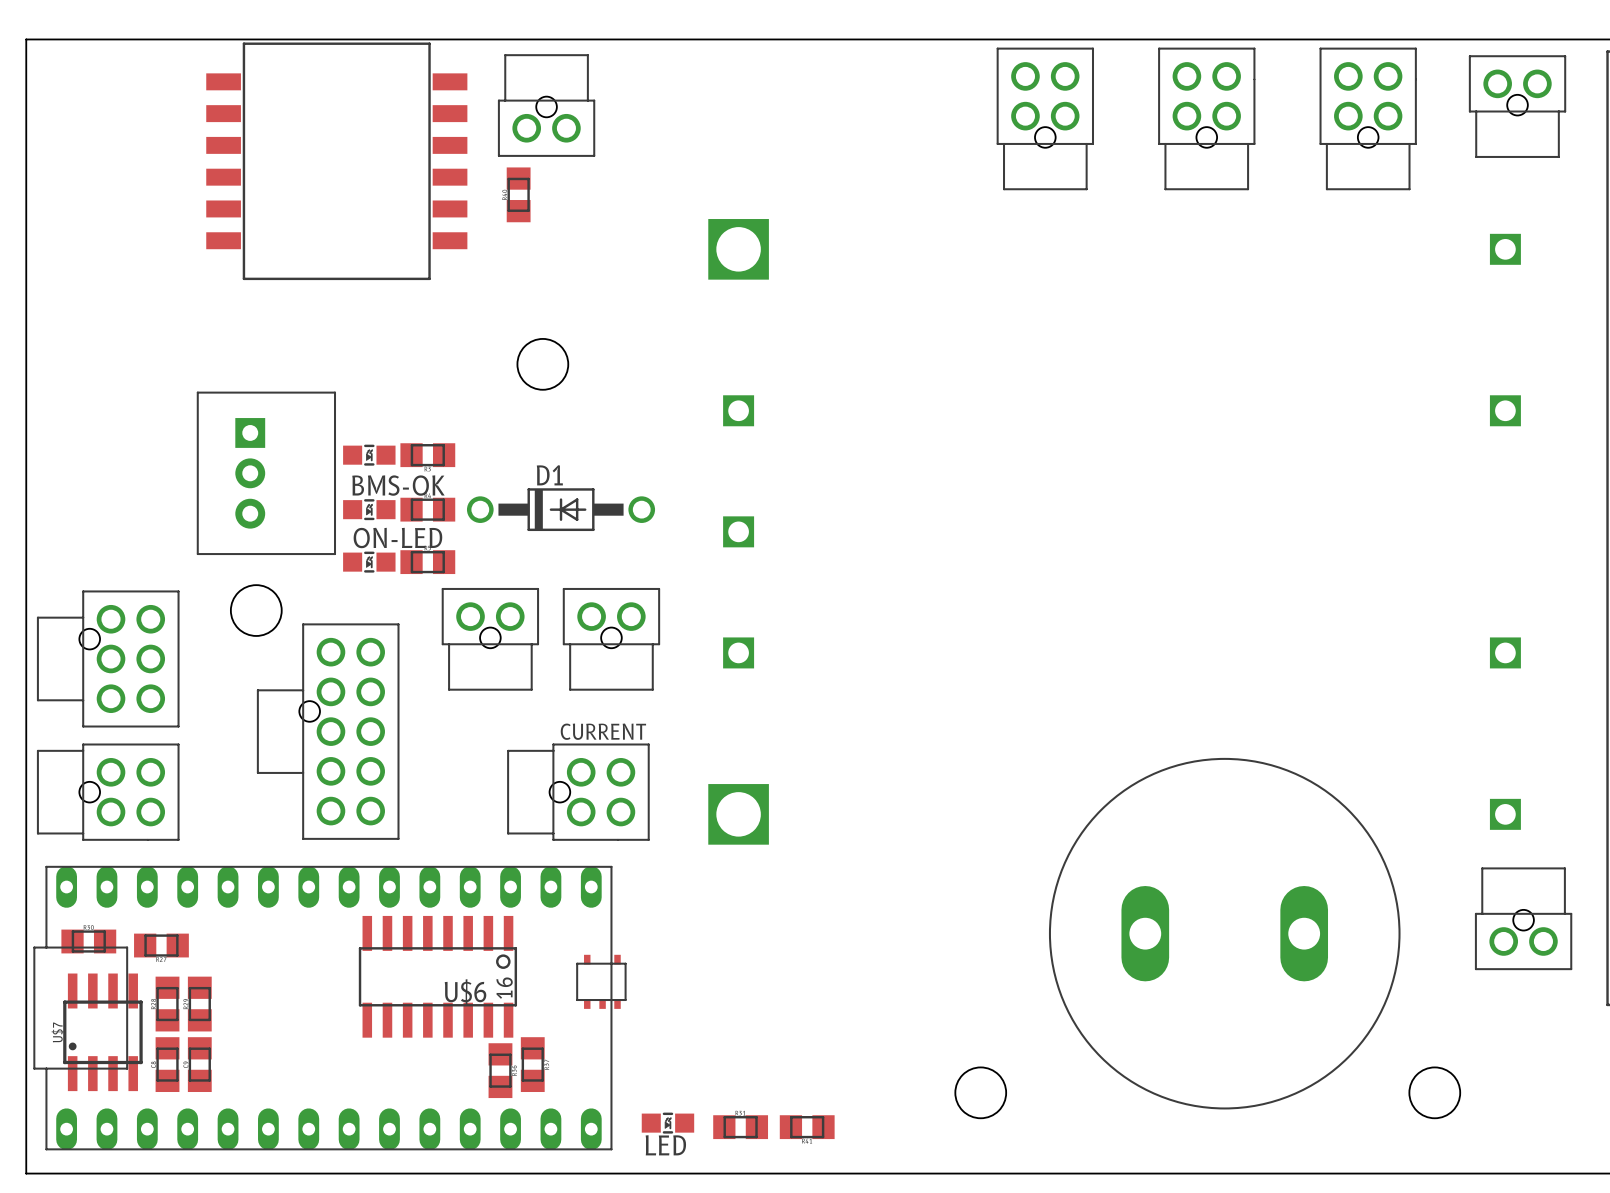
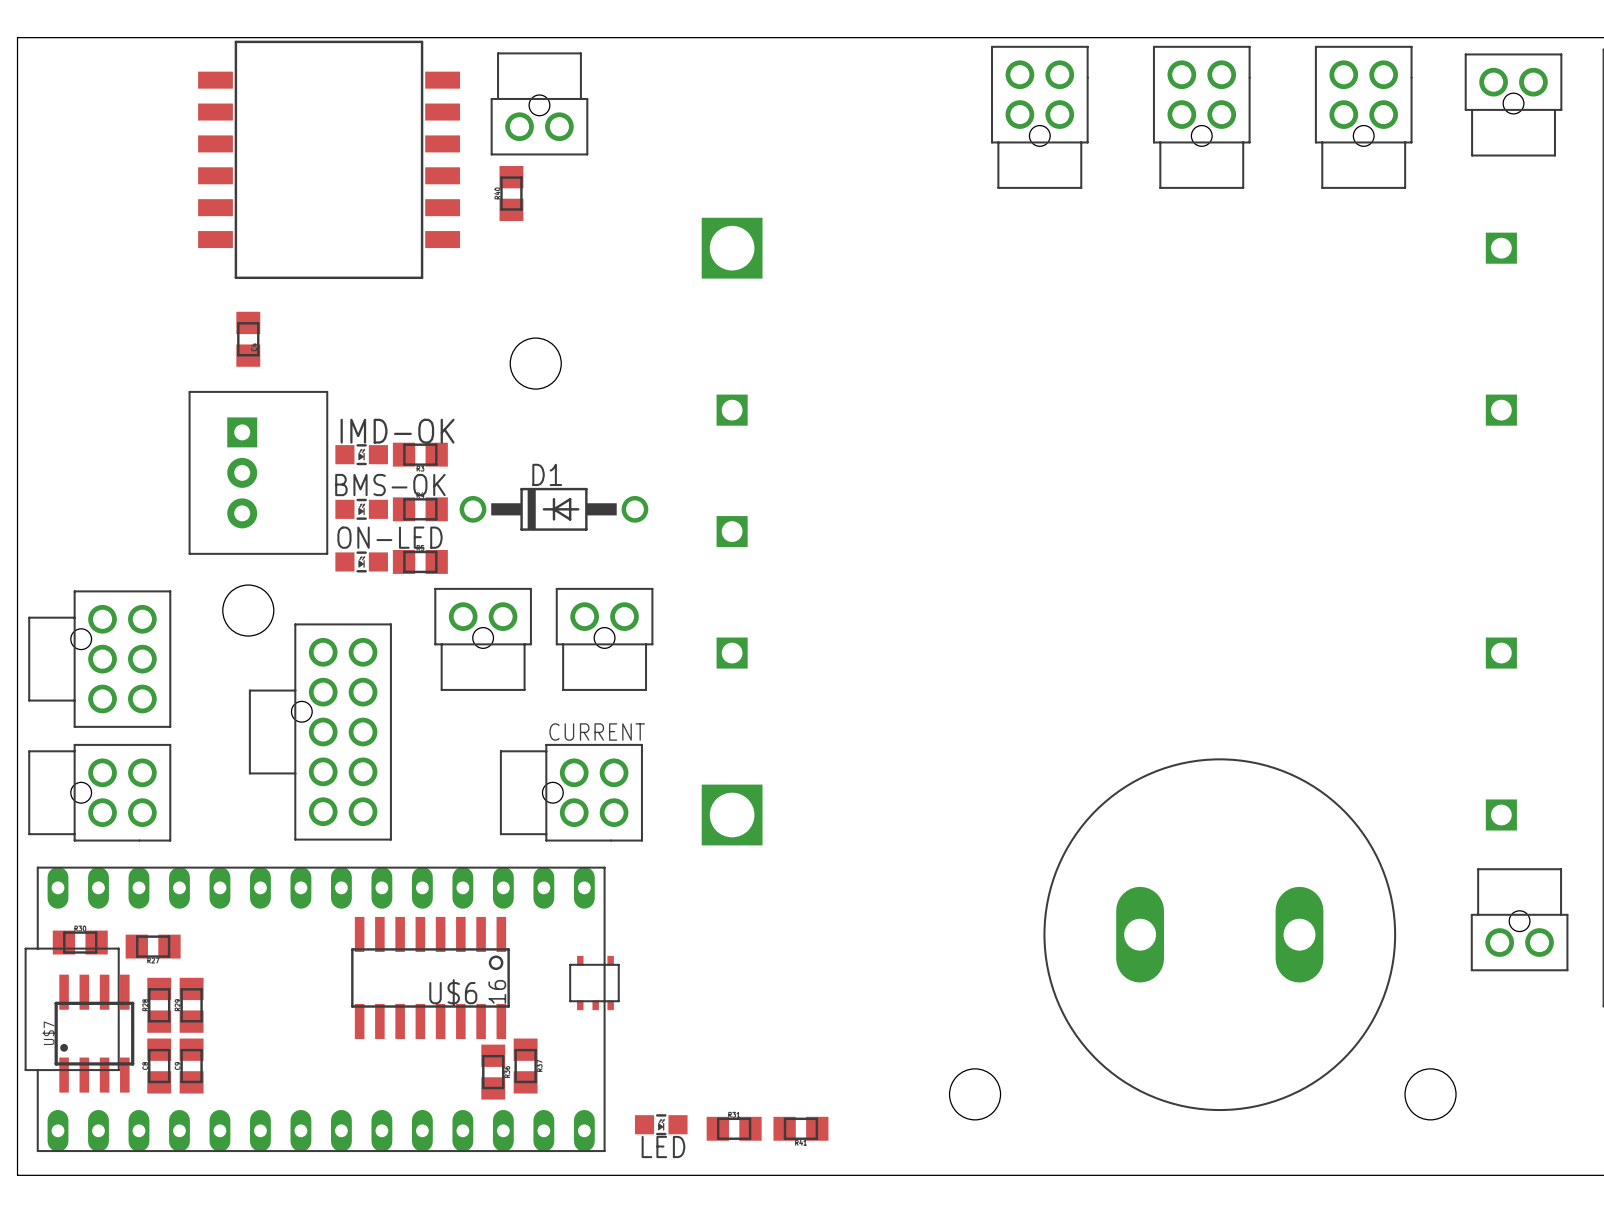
part: none -> (248, 339)
IMD-OK name: none -> IMD-OK (397, 431)

